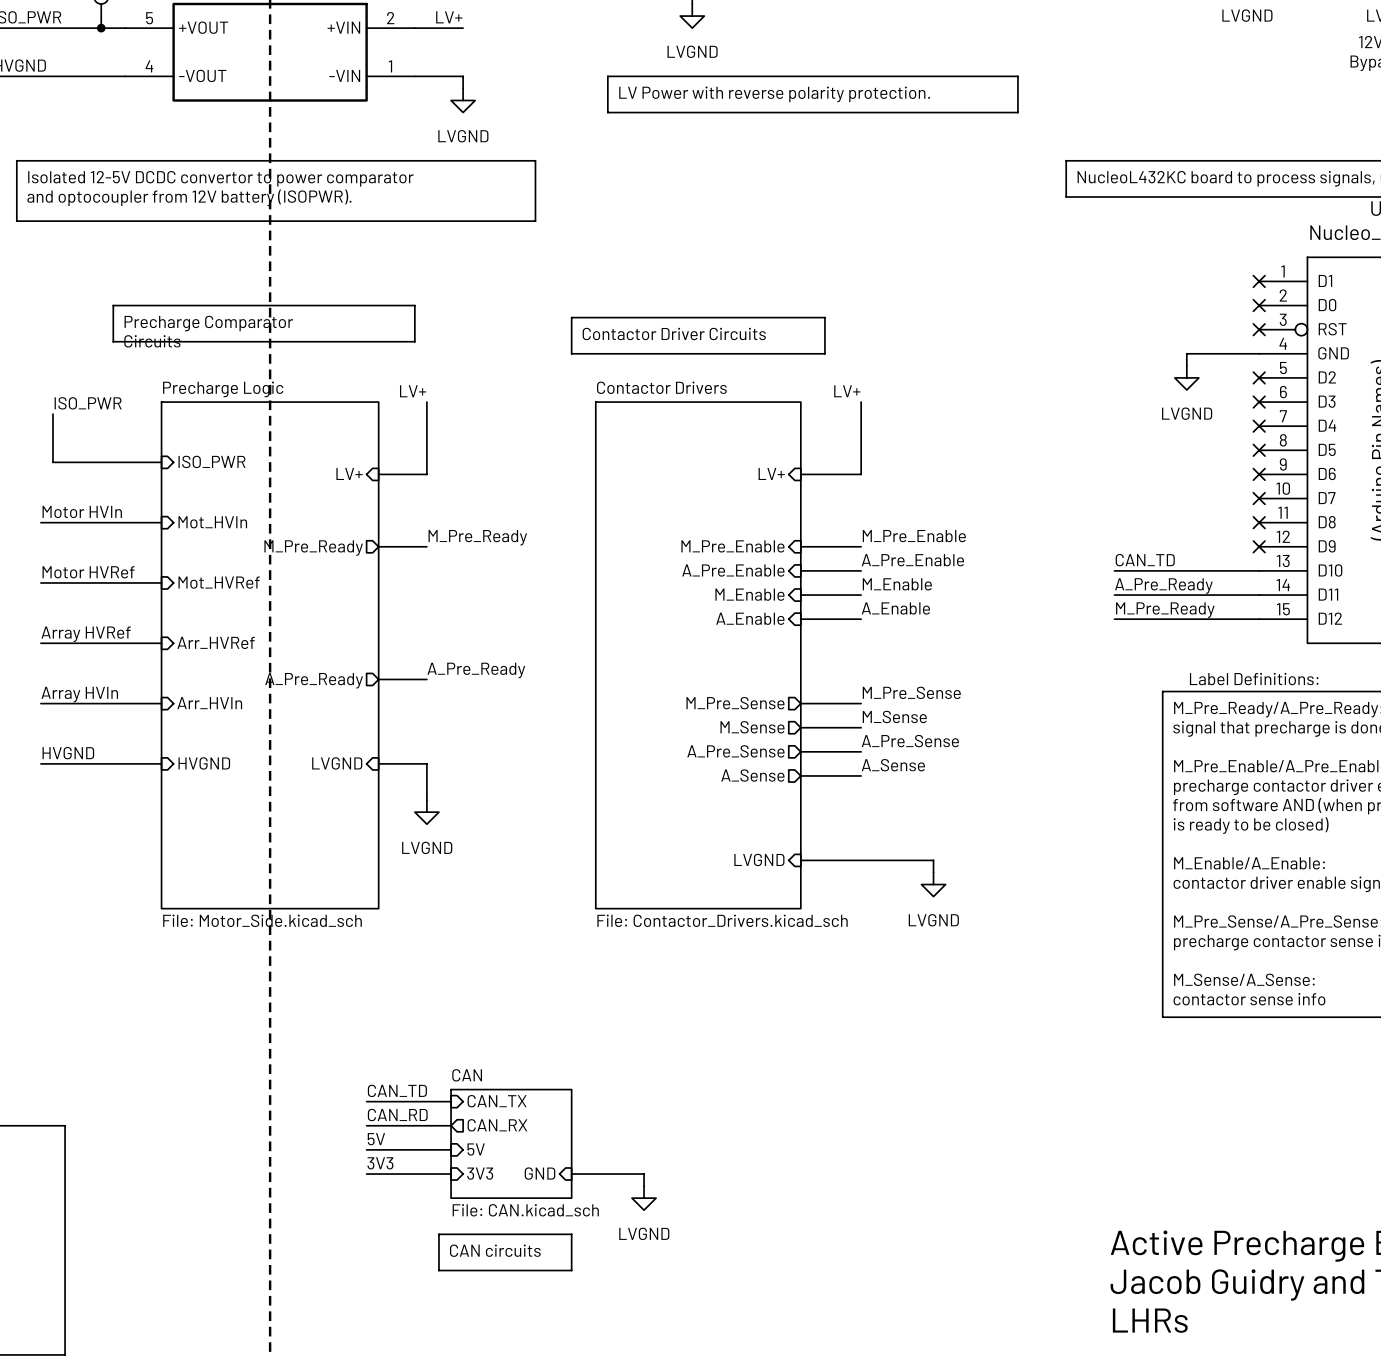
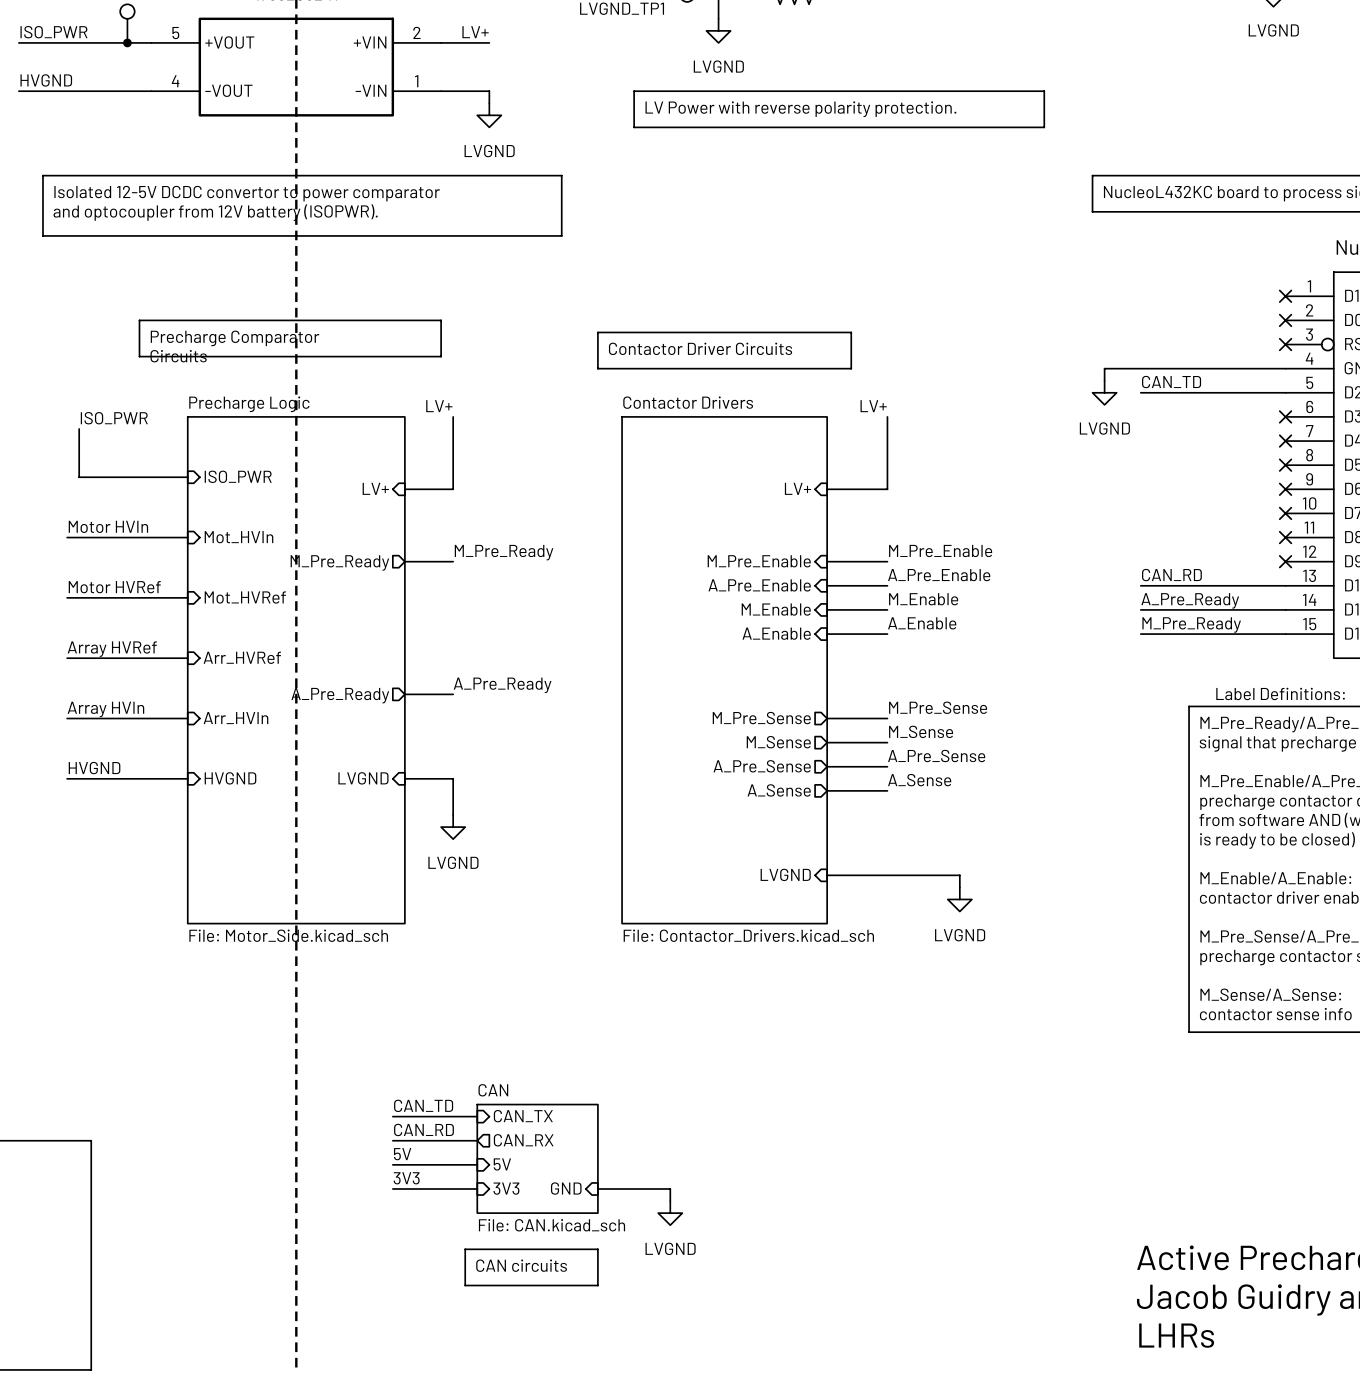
wire: (1186, 353) (1186, 365) -> (1213, 368) (1104, 368) (1104, 380)
label: none -> CAN_TD (1171, 382)
wire: none -> (1140, 392) (1285, 392)
power symbol position: LVGND (1186, 377) -> LVGND (1104, 392)
no-connect mark: (1259, 377) -> none
label: CAN_TD (1145, 560) -> CAN_RD (1171, 575)

